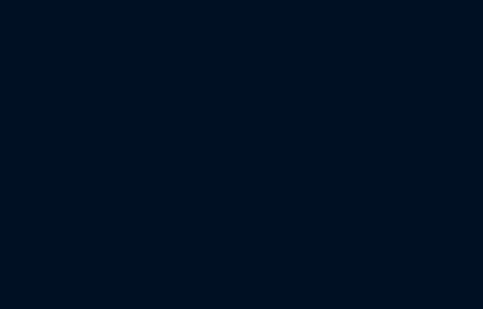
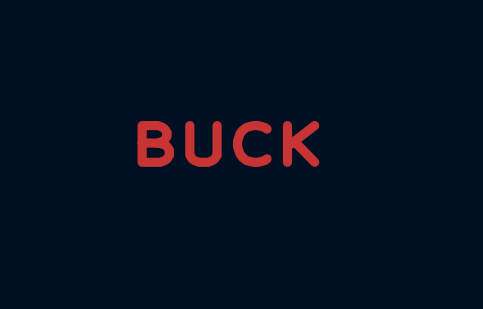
text: none -> BUCK (228, 143)

